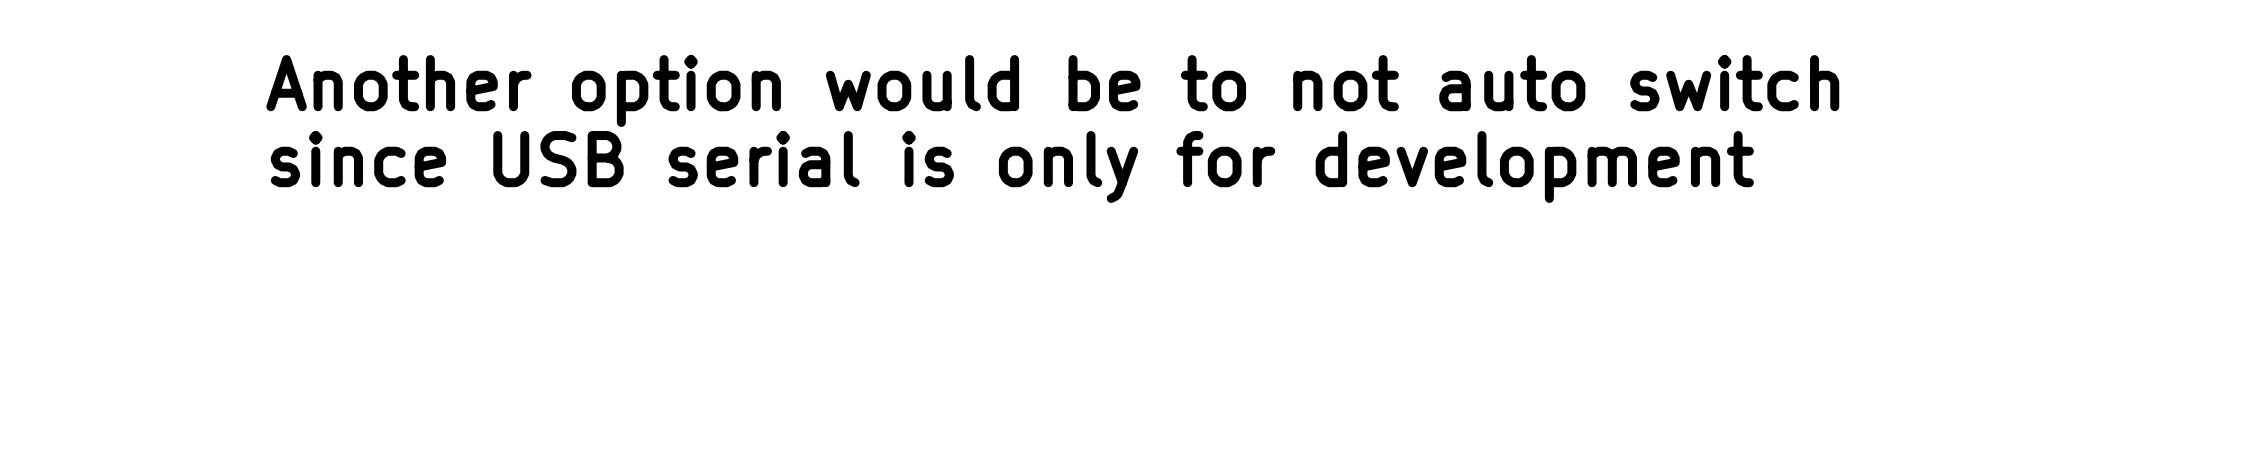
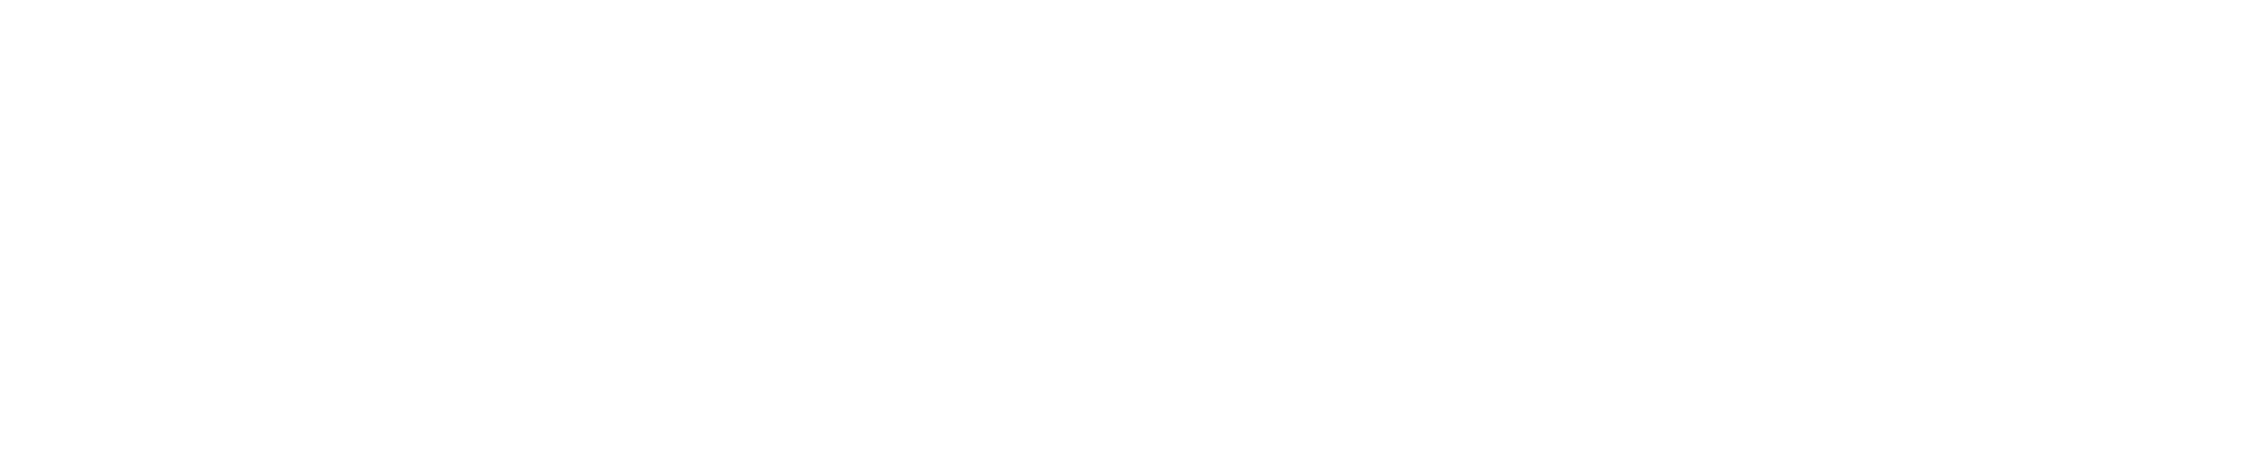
text: Another option would be to not auto switch (1052, 91) -> none
text: since USB serial is only for development (1012, 166) -> none

